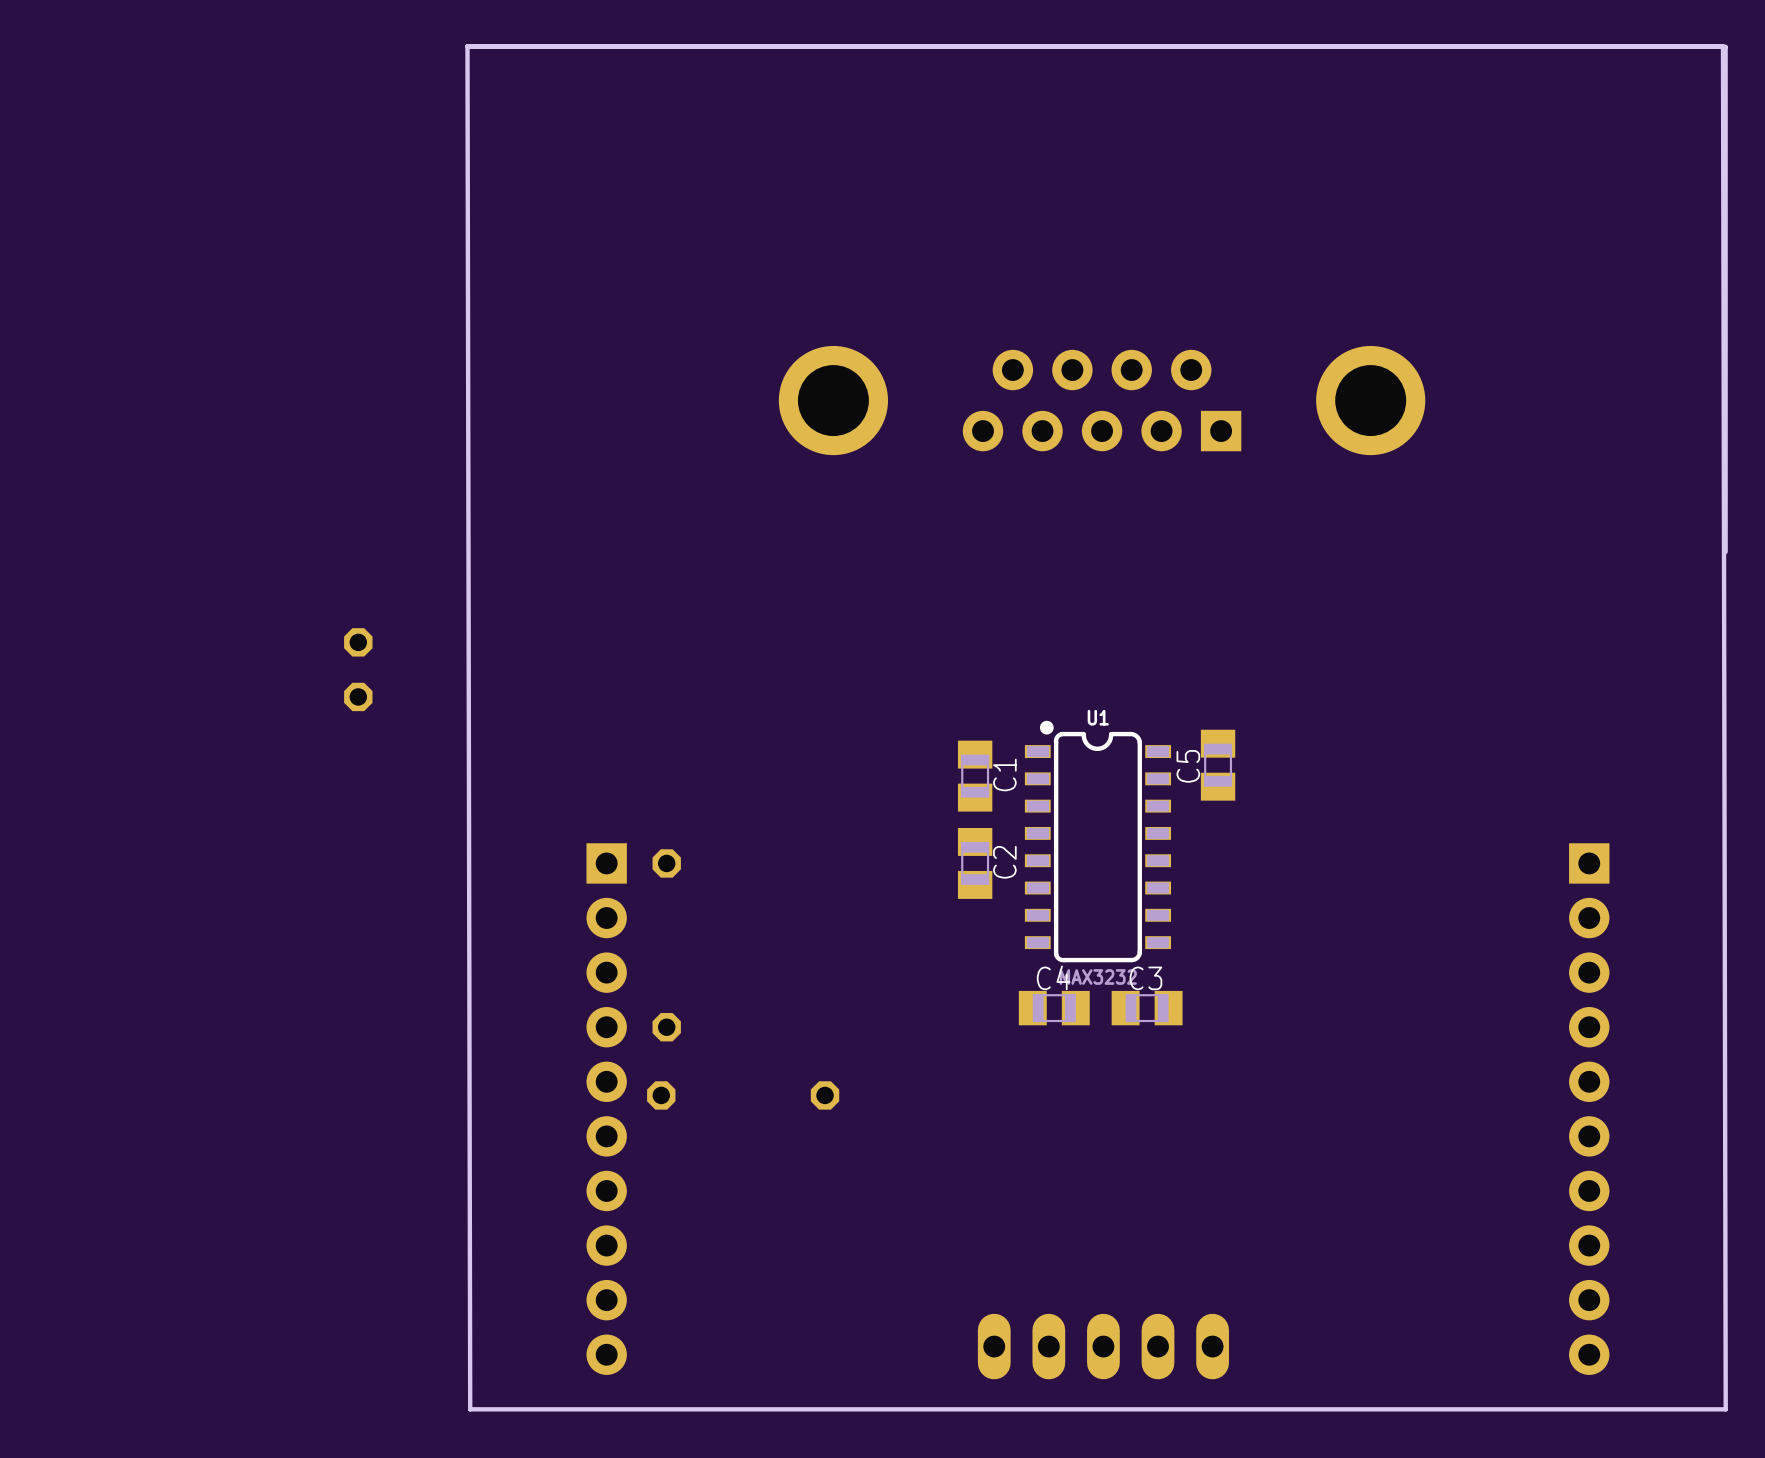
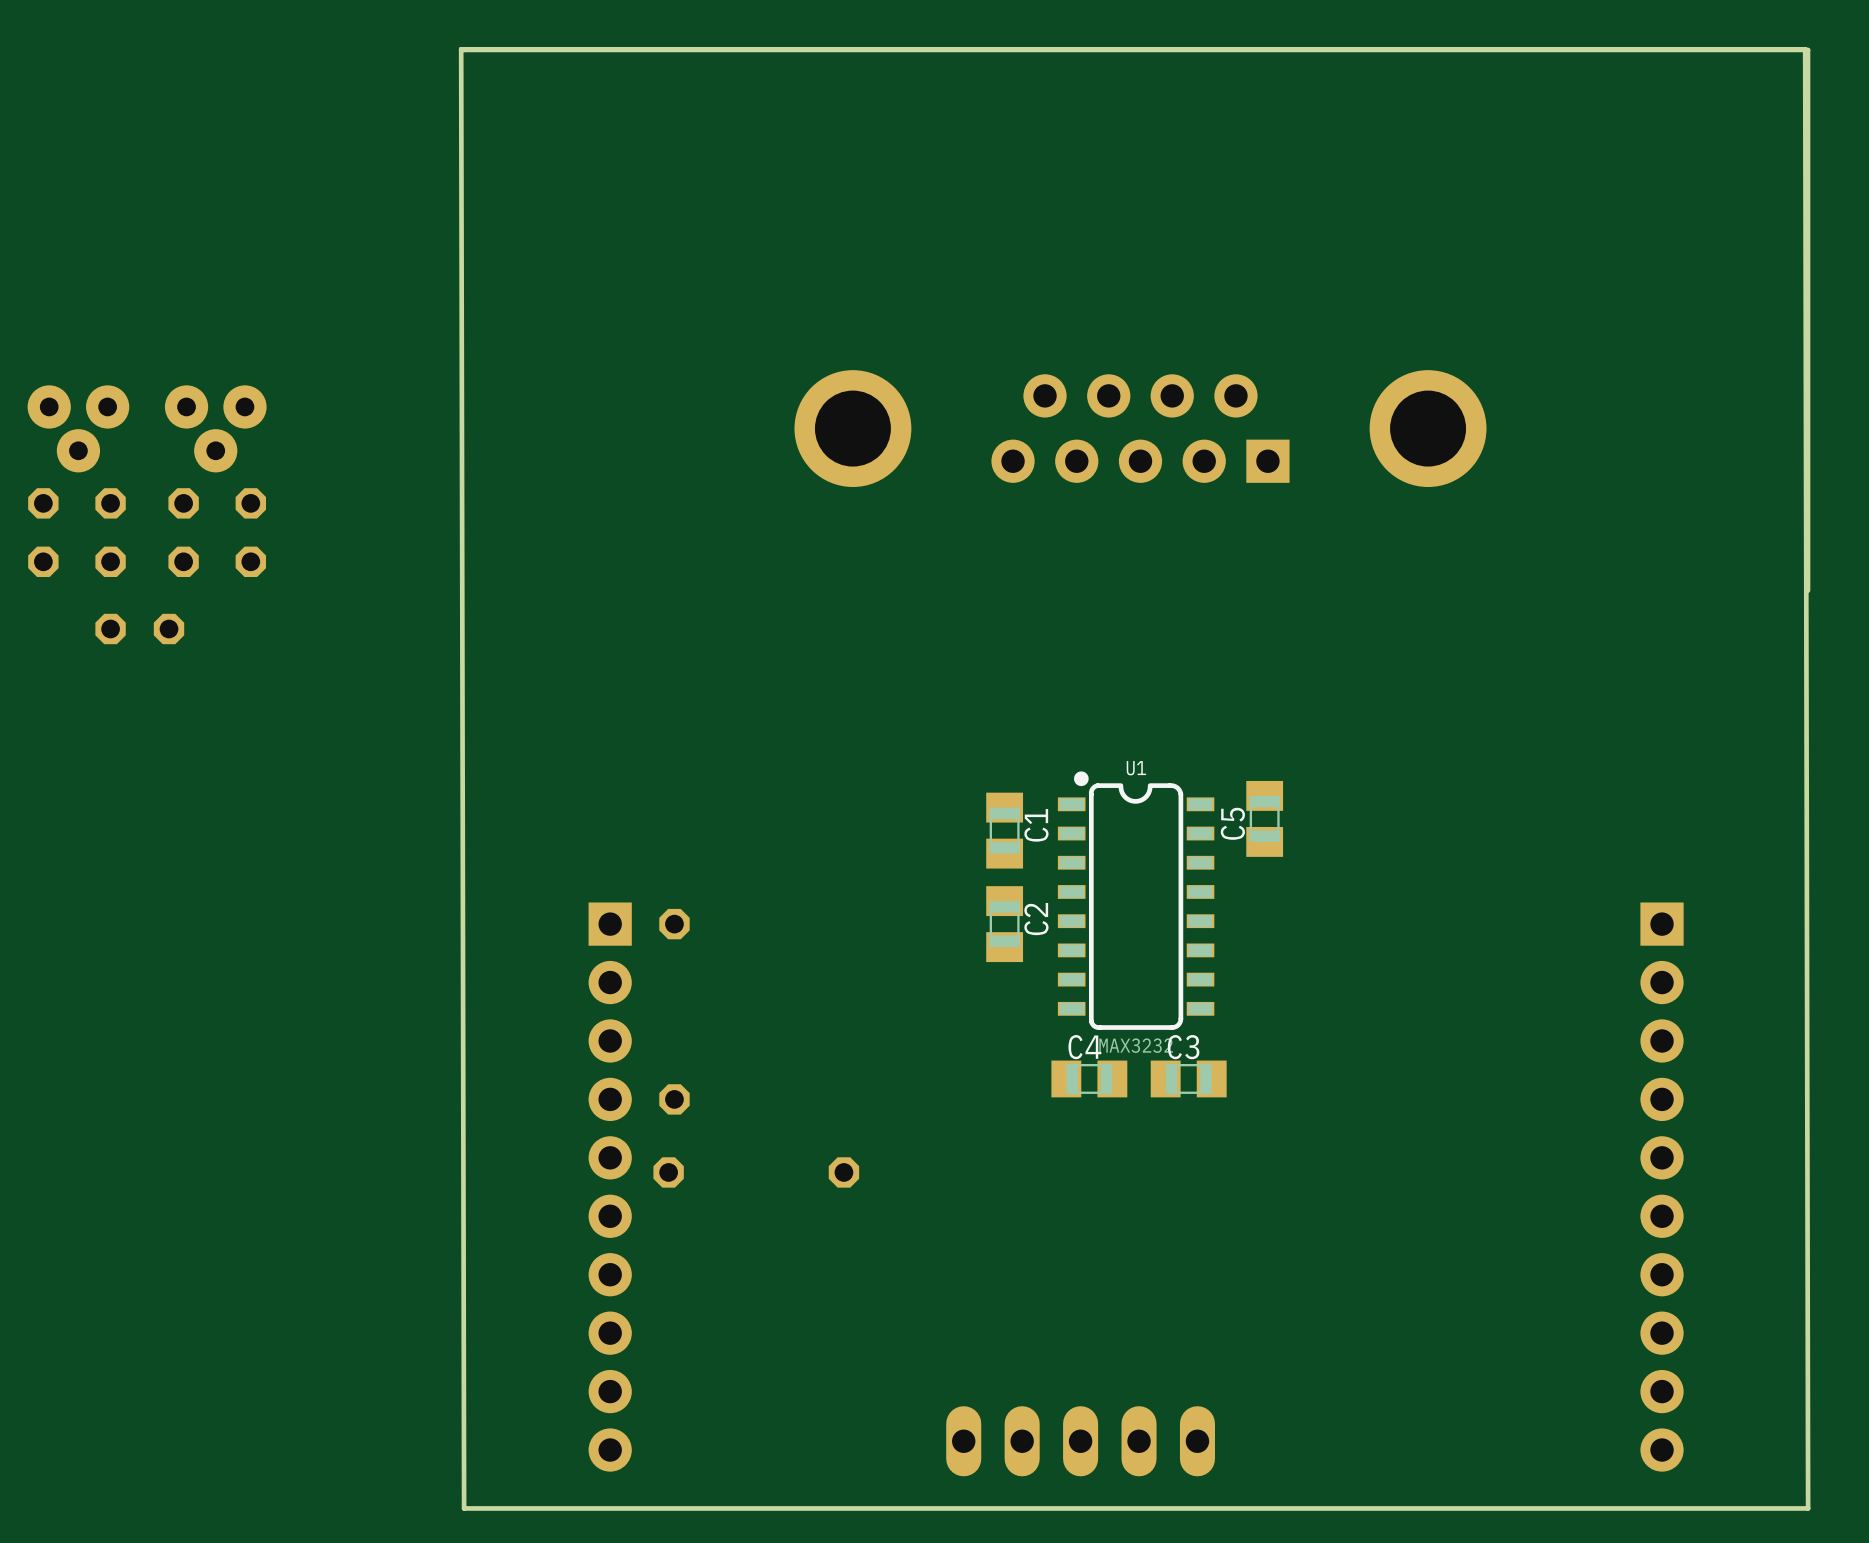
part: none -> (78, 428)
part: none -> (215, 428)
part: none -> (43, 532)
part: none -> (110, 532)
part: none -> (183, 532)
part: none -> (250, 532)
part: none -> (139, 629)
part: (358, 669) -> none
part position: (1103, 1346) -> (1080, 1441)

